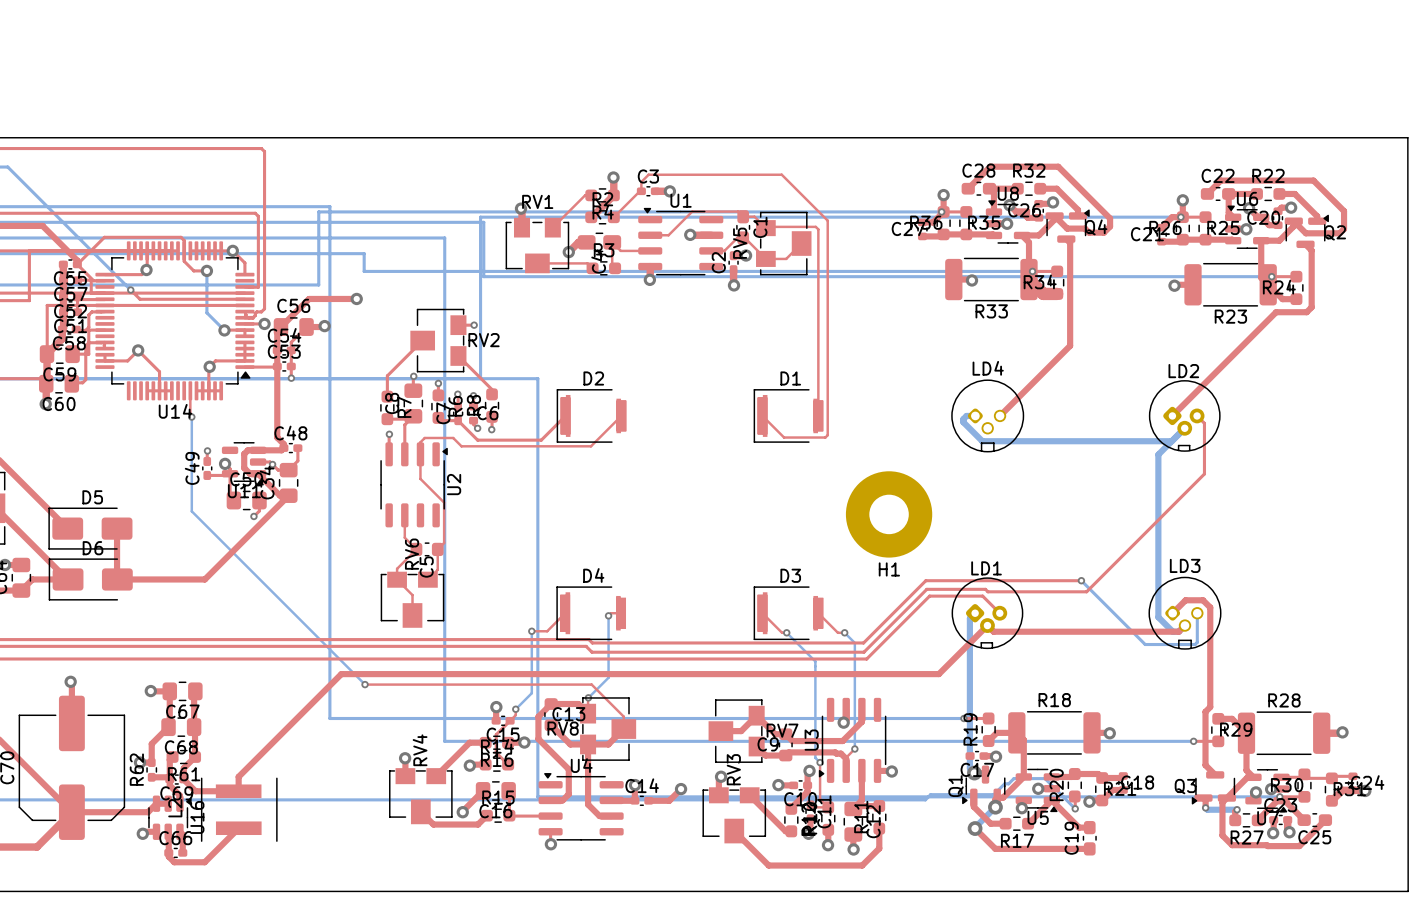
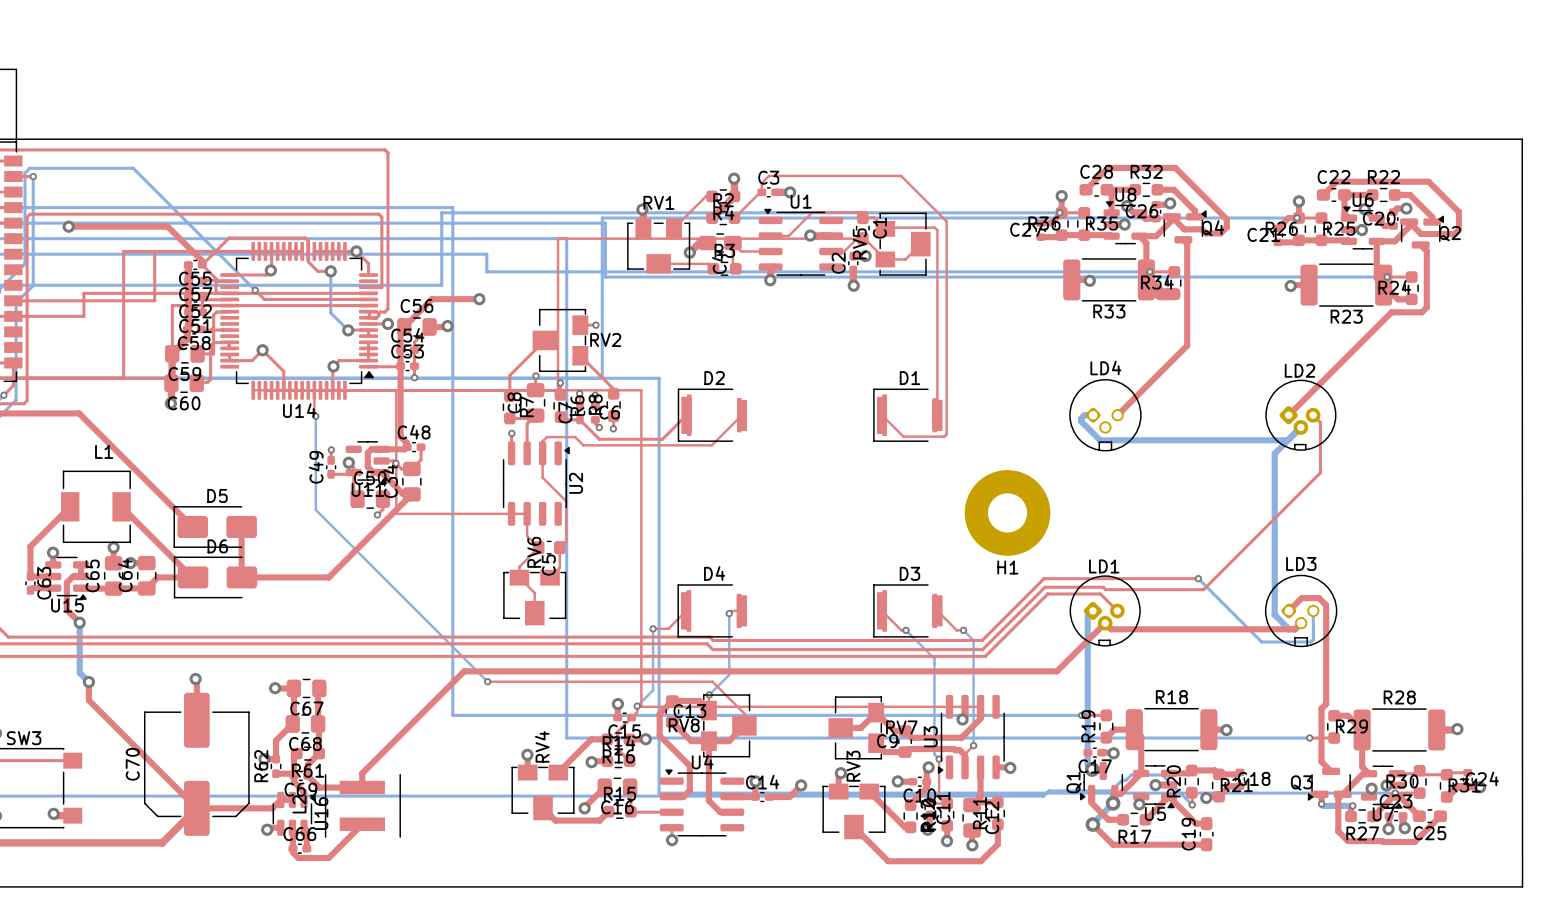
top track: none -> (857, 238) (558, 238) (558, 390)
top track: none -> (253, 390) (641, 390) (641, 706) (980, 706)
top track: none -> (396, 390) (396, 513) (527, 513)

